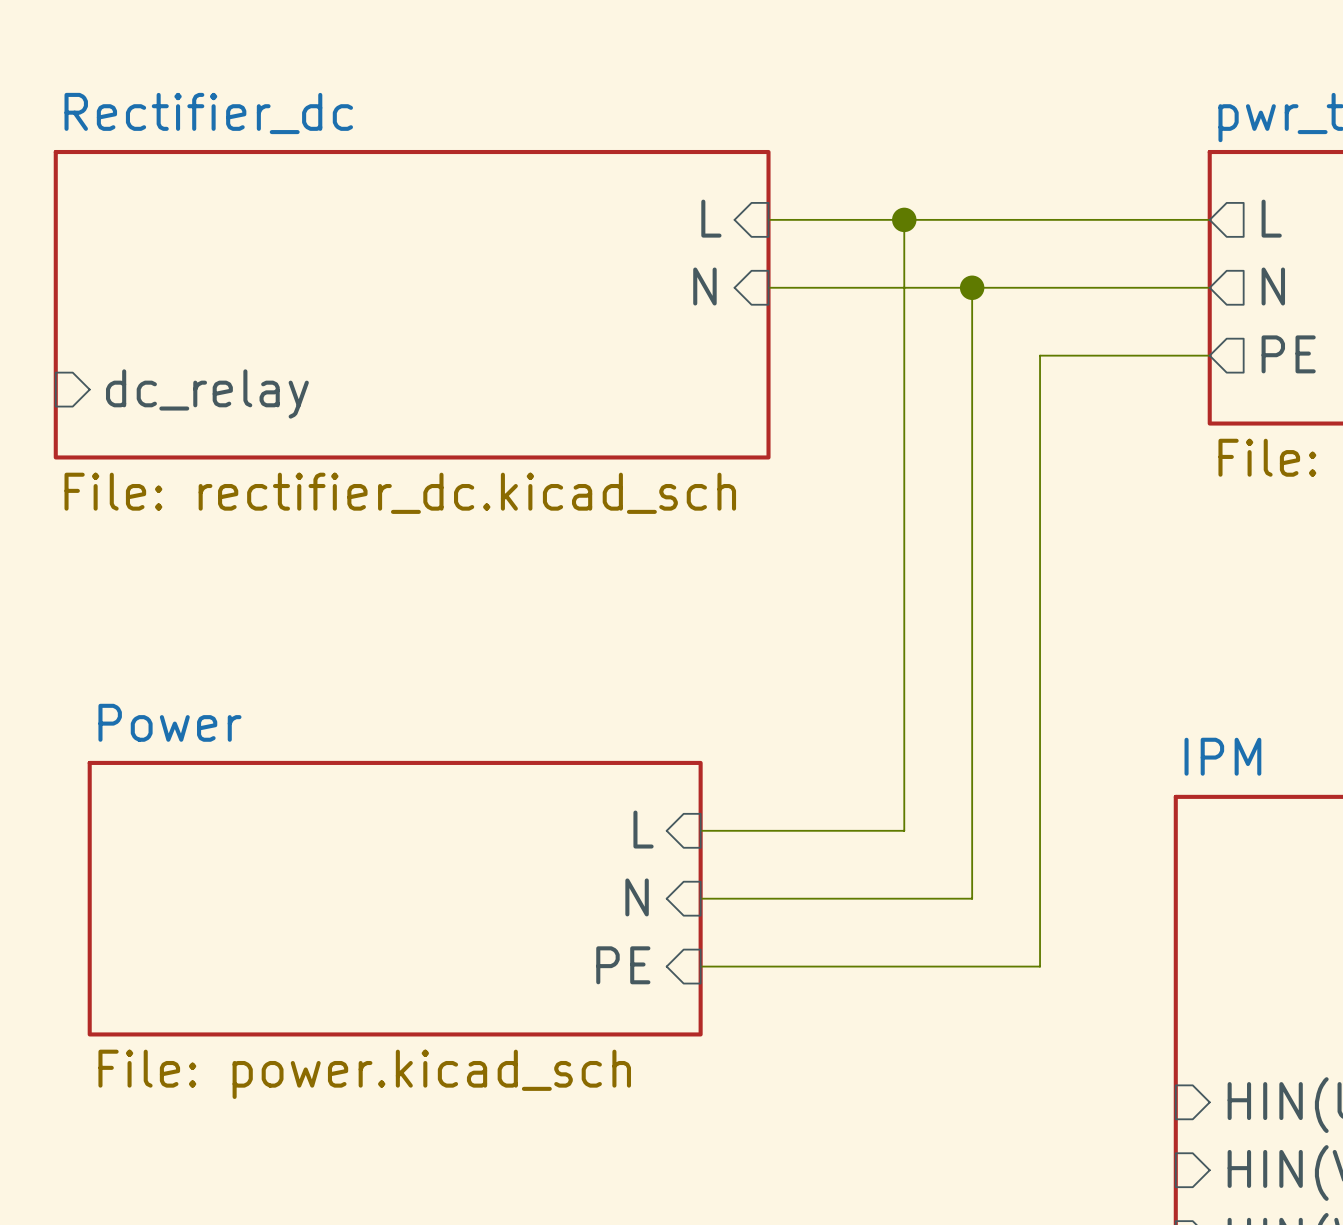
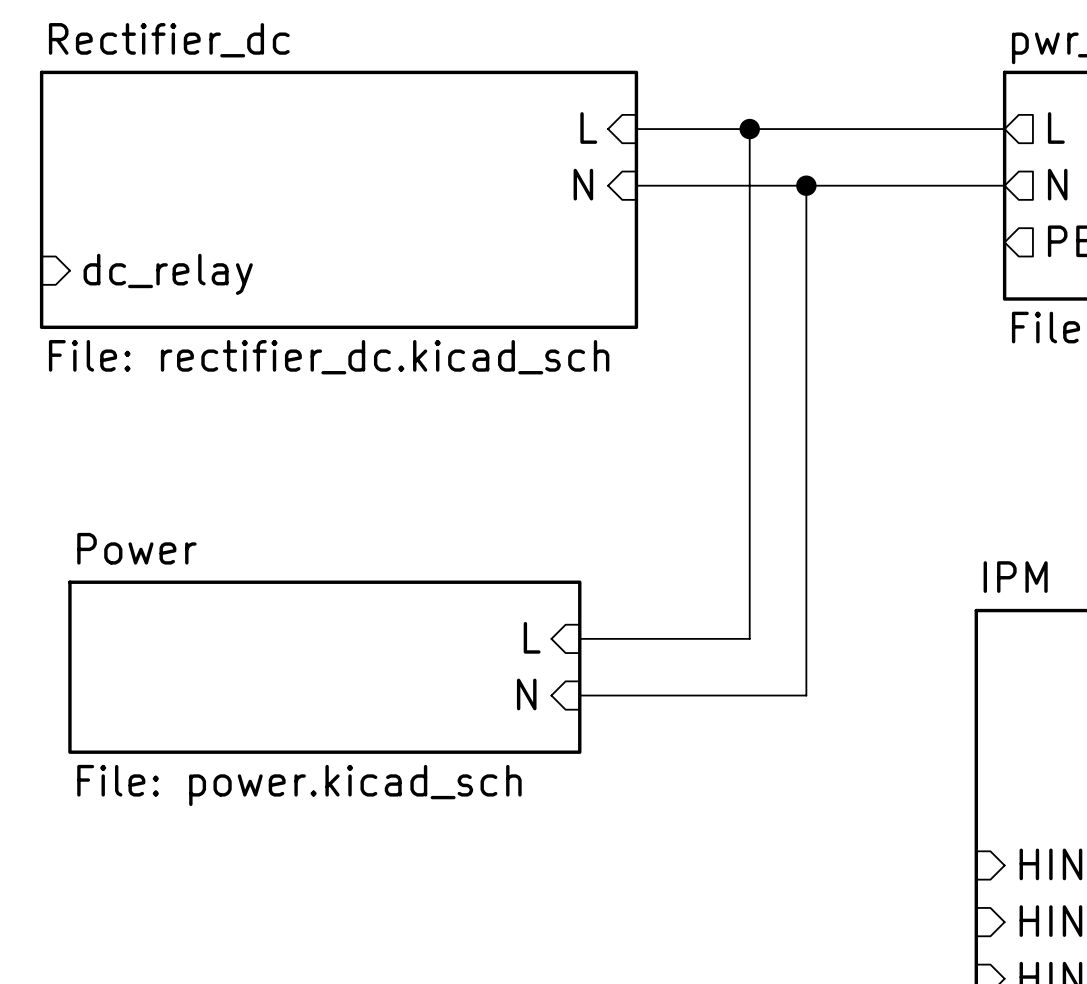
wire: (1209, 355) (1040, 355) (1040, 966) (700, 966) -> none
sheet Power: none -> File: power.kicad_sch (324, 667)
sheet Power: File: power.kicad_sch (395, 898) -> none
sheet pin: PE (623, 965) -> none

